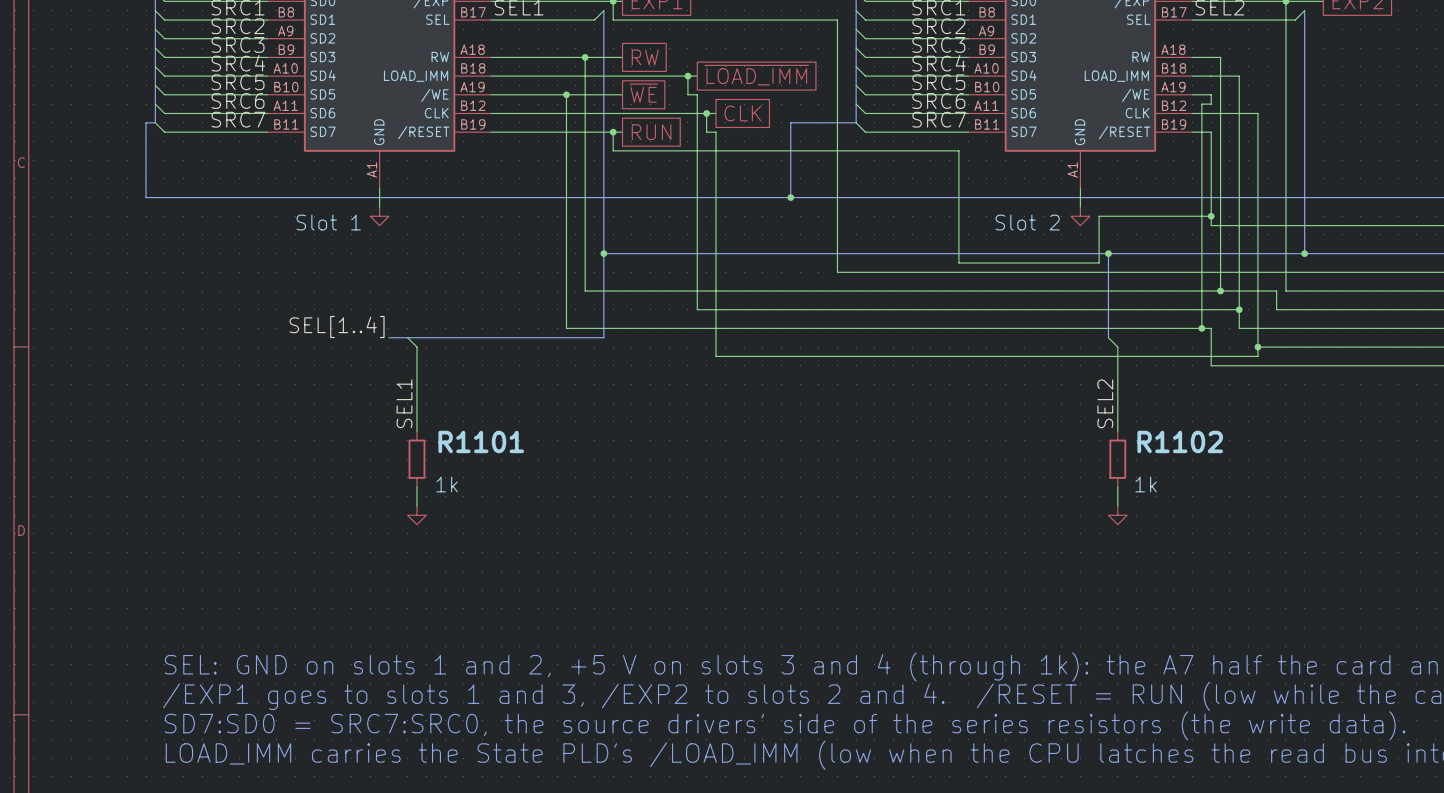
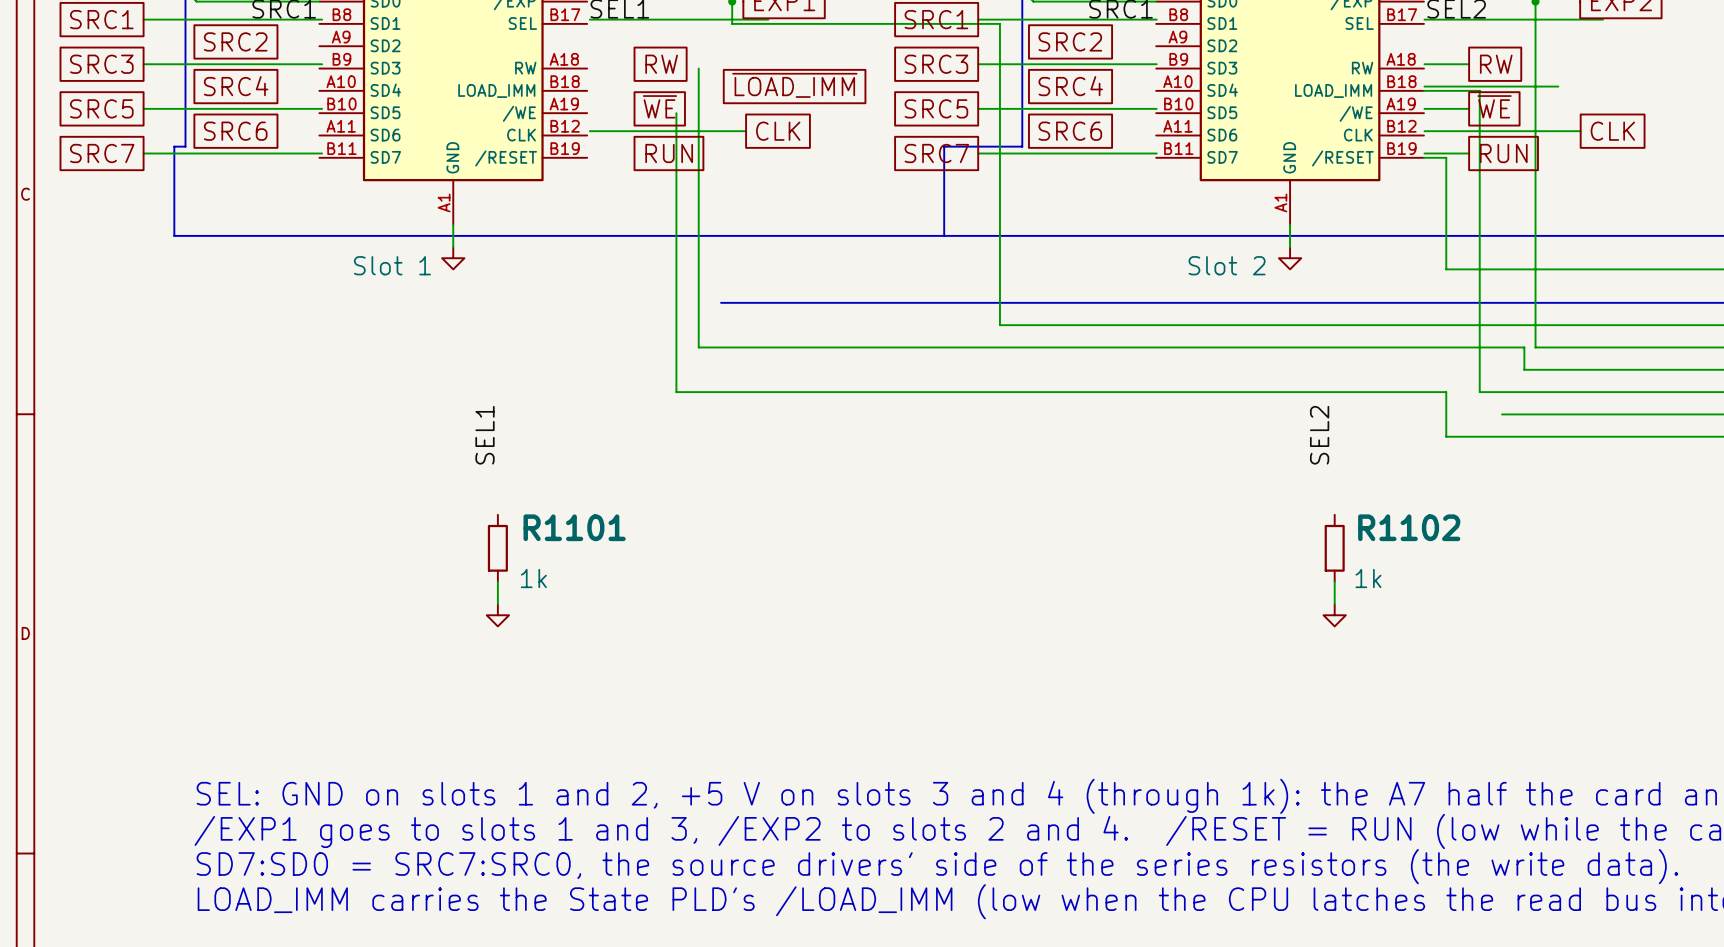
wire: (491, 1) (622, 1) -> none
wire: (1192, 1) (1323, 1) -> (1424, 131) (1580, 131)
wire: (155, 10) (164, 20) (267, 20) -> none
wire: (603, 10) (594, 20) (491, 20) -> none
bus: (603, 10) (603, 337) (388, 337) -> none
wire: (856, 10) (865, 20) (968, 20) -> none
wire: (1304, 10) (1295, 20) (1192, 20) -> none
bus: (1304, 10) (1304, 253) -> none
global label: none -> SRC1 (101, 19)
wire: none -> (143, 19) (322, 19)
wire: none -> (589, 19) (768, 19)
global label: none -> SRC1 (936, 19)
wire: none -> (978, 19) (1156, 19)
wire: none -> (1424, 19) (1603, 19)
label: SRC2 (238, 26) -> none
label: SRC2 (938, 26) -> none
wire: (155, 29) (164, 38) (267, 38) -> none
wire: (856, 29) (865, 38) (968, 38) -> none
global label: none -> SRC2 (235, 41)
global label: none -> SRC2 (1070, 41)
label: SRC3 (238, 44) -> none
label: SRC3 (938, 44) -> none
wire: (155, 48) (164, 57) (267, 57) -> none
wire: (856, 48) (865, 57) (968, 57) -> none
global label: none -> SRC3 (101, 64)
wire: none -> (143, 64) (322, 64)
global label: none -> SRC3 (936, 64)
wire: none -> (978, 64) (1156, 64)
wire: none -> (1424, 64) (1469, 64)
global label: none -> RW (1496, 64)
wire: (491, 57) (622, 57) -> none
junction: (585, 57) -> none
global label position: RW (645, 57) -> RW (661, 64)
wire: (1192, 57) (1220, 57) (1220, 291) -> none
label: SRC4 (238, 63) -> none
label: SRC4 (939, 63) -> none
wire: (155, 66) (164, 76) (267, 76) -> none
wire: (856, 66) (865, 76) (968, 76) -> none
global label: none -> SRC4 (236, 86)
global label: none -> SRC4 (1070, 86)
wire: none -> (1424, 86) (1558, 86)
global label position: ~{LOAD_IMM} (756, 75) -> ~{LOAD_IMM} (794, 85)
wire: (491, 76) (697, 76) -> none
wire: (687, 76) (687, 94) (697, 94) (697, 309) (1239, 309) -> none
junction: (687, 76) -> none
label: SRC5 (238, 82) -> none
label: SRC5 (938, 82) -> none
wire: (155, 85) (164, 94) (267, 94) -> none
wire: (856, 85) (865, 94) (968, 94) -> none
global label: none -> ~{WE} (1494, 106)
global label: none -> SRC5 (101, 108)
wire: none -> (143, 108) (322, 108)
global label: none -> SRC5 (936, 108)
wire: none -> (978, 108) (1156, 108)
wire: none -> (1424, 108) (1469, 108)
global label position: ~{WE} (643, 93) -> ~{WE} (659, 106)
wire: (491, 94) (622, 94) -> (589, 131) (746, 131)
junction: (566, 94) -> none
wire: (1192, 94) (1211, 94) (1211, 104) (1201, 104) (1201, 328) -> none
label: SRC6 (238, 100) -> none
label: SRC6 (938, 100) -> none
wire: (155, 104) (164, 113) (267, 113) -> none
wire: (856, 104) (865, 113) (968, 113) -> none
global label: none -> SRC6 (235, 131)
global label: none -> SRC6 (1070, 131)
global label: none -> CLK (1612, 131)
wire: (491, 113) (715, 113) -> none
wire: (706, 113) (706, 132) (715, 132) (715, 356) (1257, 356) (1257, 113) (1192, 113) -> none
junction: (706, 113) -> none
global label position: CLK (742, 113) -> CLK (778, 131)
label: SRC7 (238, 119) -> none
label: SRC7 (939, 119) -> none
wire: (155, 122) (164, 132) (267, 132) -> none
wire: (856, 122) (865, 132) (968, 132) -> none
global label: none -> SRC7 (102, 153)
wire: none -> (143, 153) (322, 153)
global label: none -> SRC7 (936, 153)
wire: none -> (978, 153) (1156, 153)
wire: none -> (1424, 153) (1469, 153)
global label: none -> RUN (1503, 153)
wire: (491, 132) (622, 132) -> none
wire: (613, 132) (613, 150) (958, 150) (958, 262) (1099, 262) (1099, 216) (1211, 216) -> none
junction: (613, 132) -> none
global label position: RUN (651, 132) -> RUN (669, 153)
junction: (790, 197) -> none
junction: (1211, 216) -> none
junction: (603, 253) -> none
bus: (1108, 253) (1108, 337) -> none
junction: (1108, 253) -> none
junction: (1304, 253) -> none
junction: (1220, 291) -> none
junction: (1239, 309) -> none
label: SEL[1..4] (337, 326) -> none
junction: (1201, 328) -> none
wire: (407, 337) (416, 347) (416, 431) -> none
wire: (1108, 337) (1117, 347) (1117, 431) -> none
junction: (1257, 347) -> none
label position: SEL1 (404, 403) -> SEL1 (485, 435)
label position: SEL2 (1105, 403) -> SEL2 (1319, 435)

